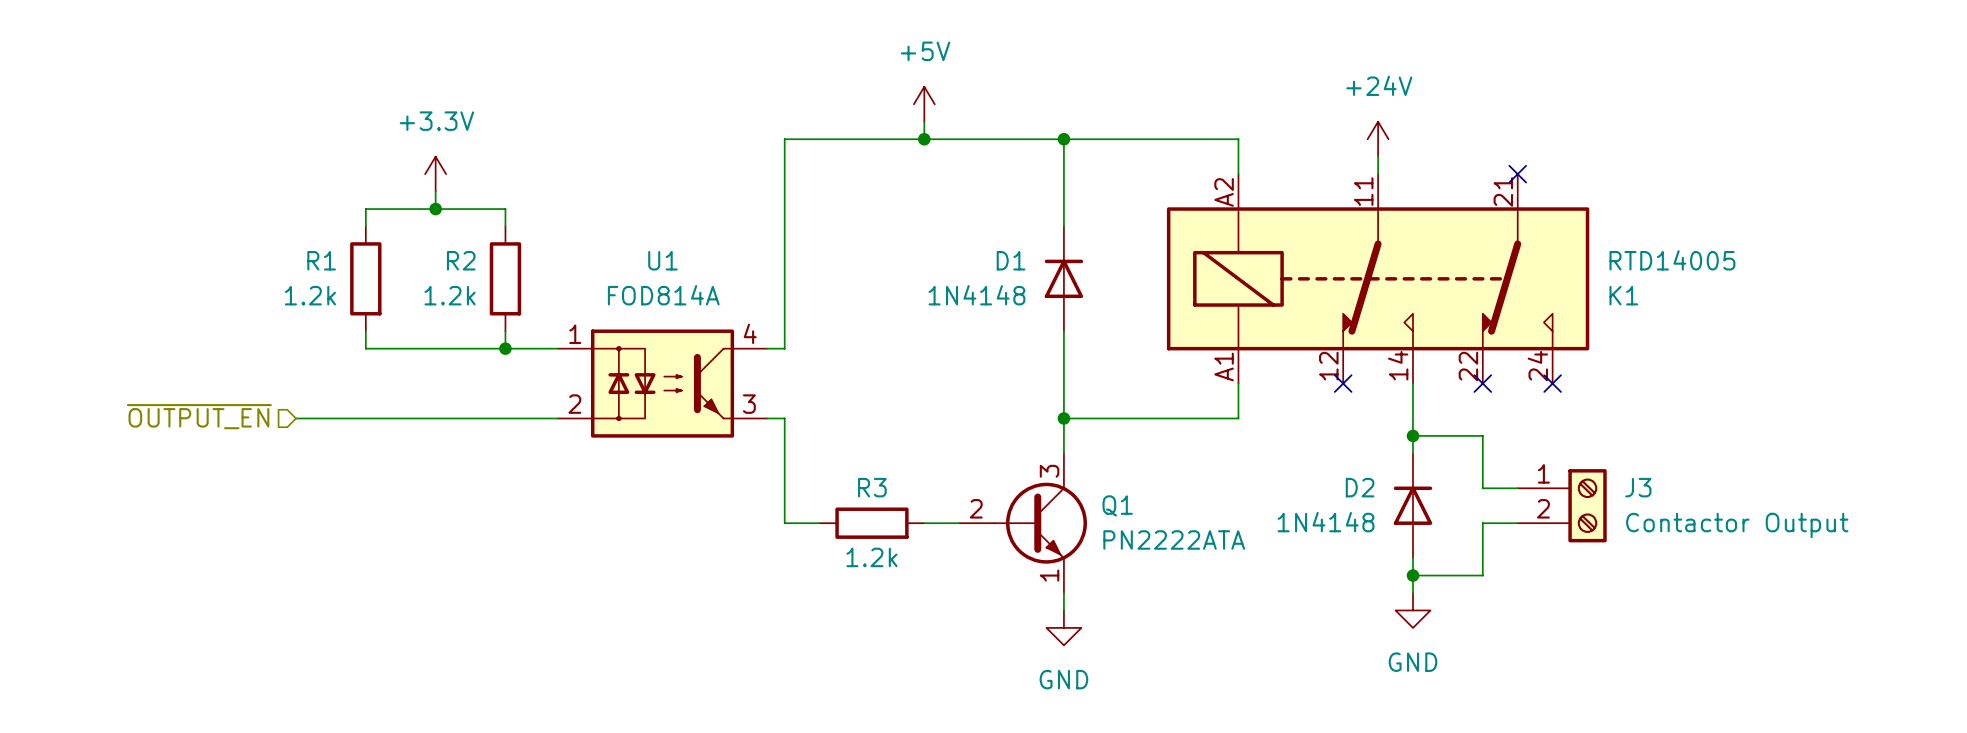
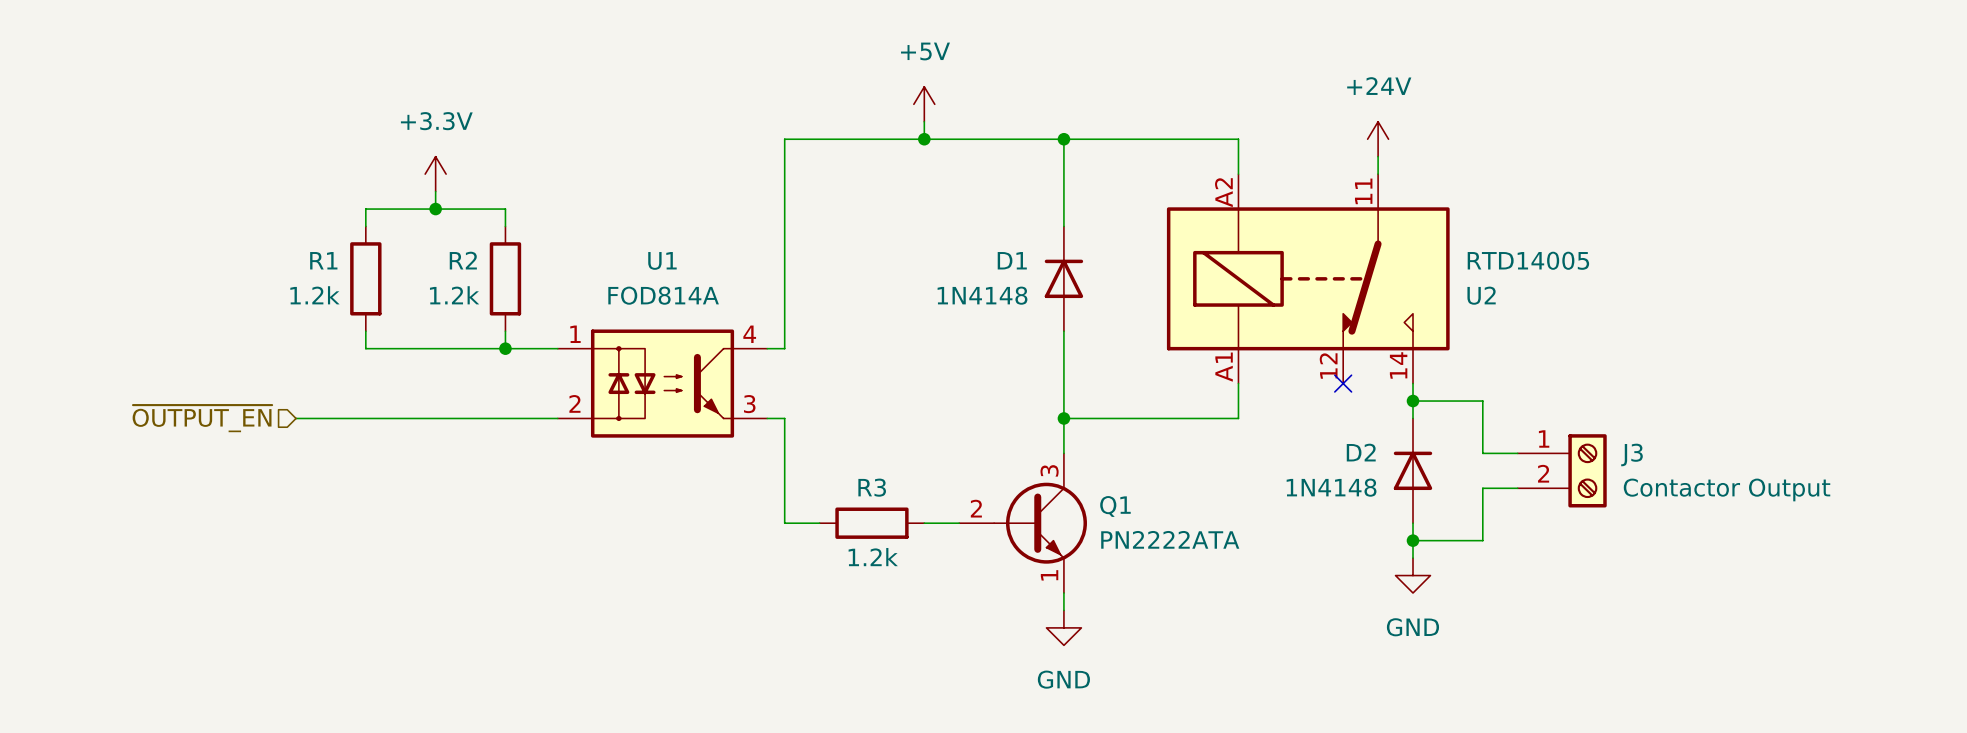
no-connect mark: (1517, 174) -> none
U2: none -> RTD14005 (1308, 278)
K1: RTD14005 (1378, 278) -> none
no-connect mark: (1482, 383) -> none
no-connect mark: (1552, 383) -> none
wire: (1413, 435) (1482, 435) -> (1413, 401) (1482, 401) (1482, 435)
junction position: (1413, 435) -> (1413, 401)
wire: (1482, 453) (1482, 488) -> (1482, 453) (1517, 453)
D2 position: (1413, 505) -> (1413, 470)
J3 position: (1562, 505) -> (1562, 470)
wire: (1482, 523) (1517, 523) -> (1482, 523) (1482, 488)
wire: (1482, 540) (1482, 575) (1413, 575) -> (1482, 540) (1413, 540)
junction position: (1413, 575) -> (1413, 540)
power symbol position: GND (1413, 610) -> GND (1413, 575)

